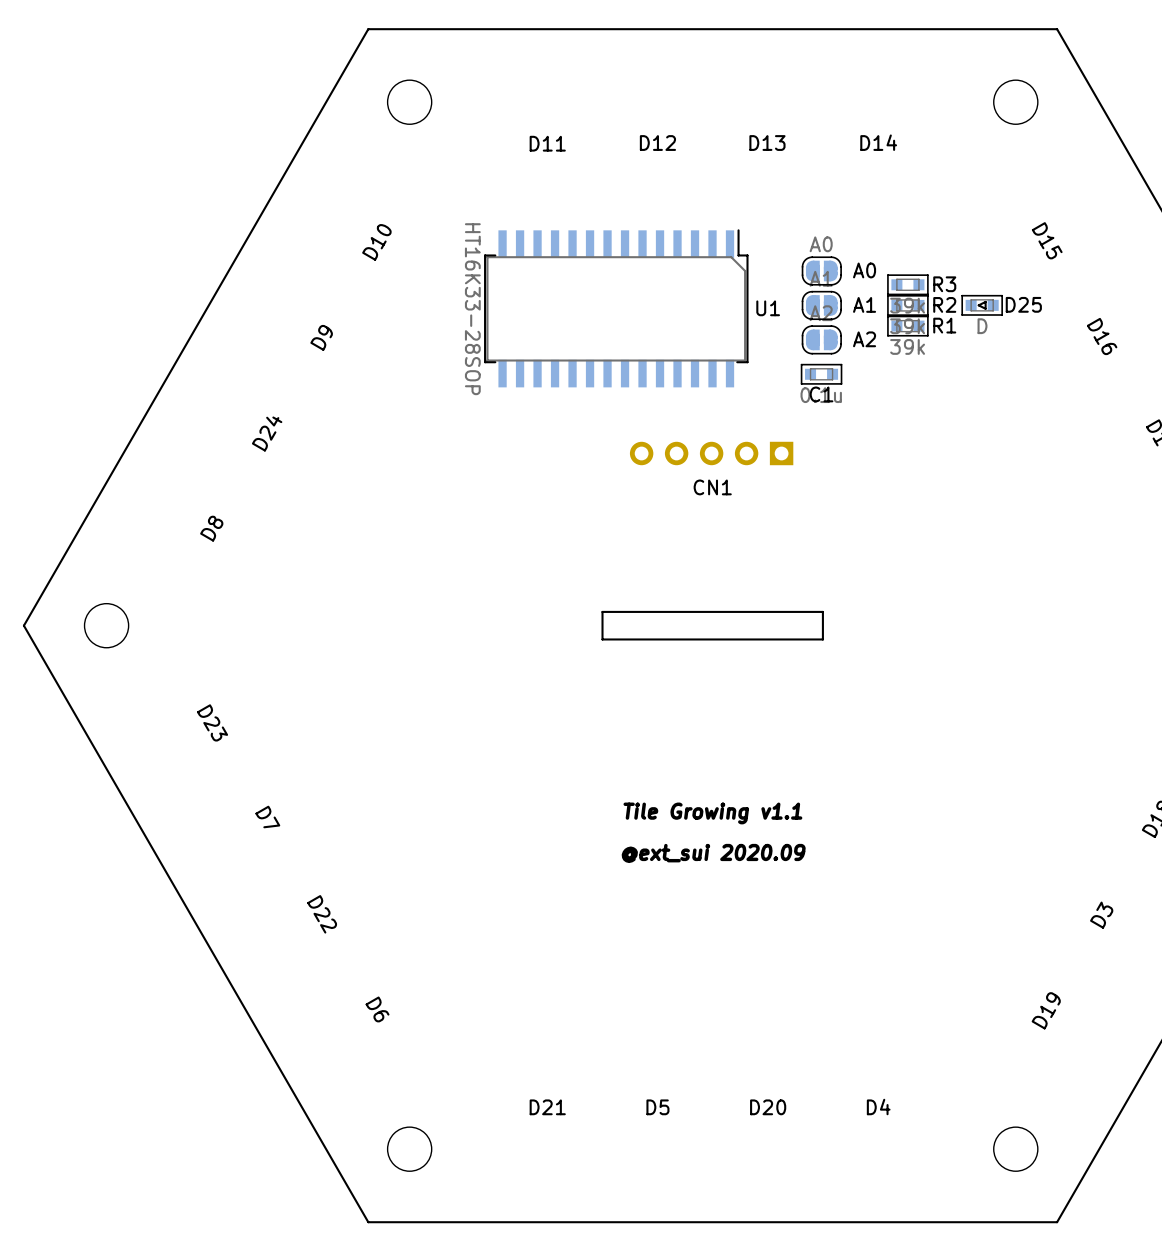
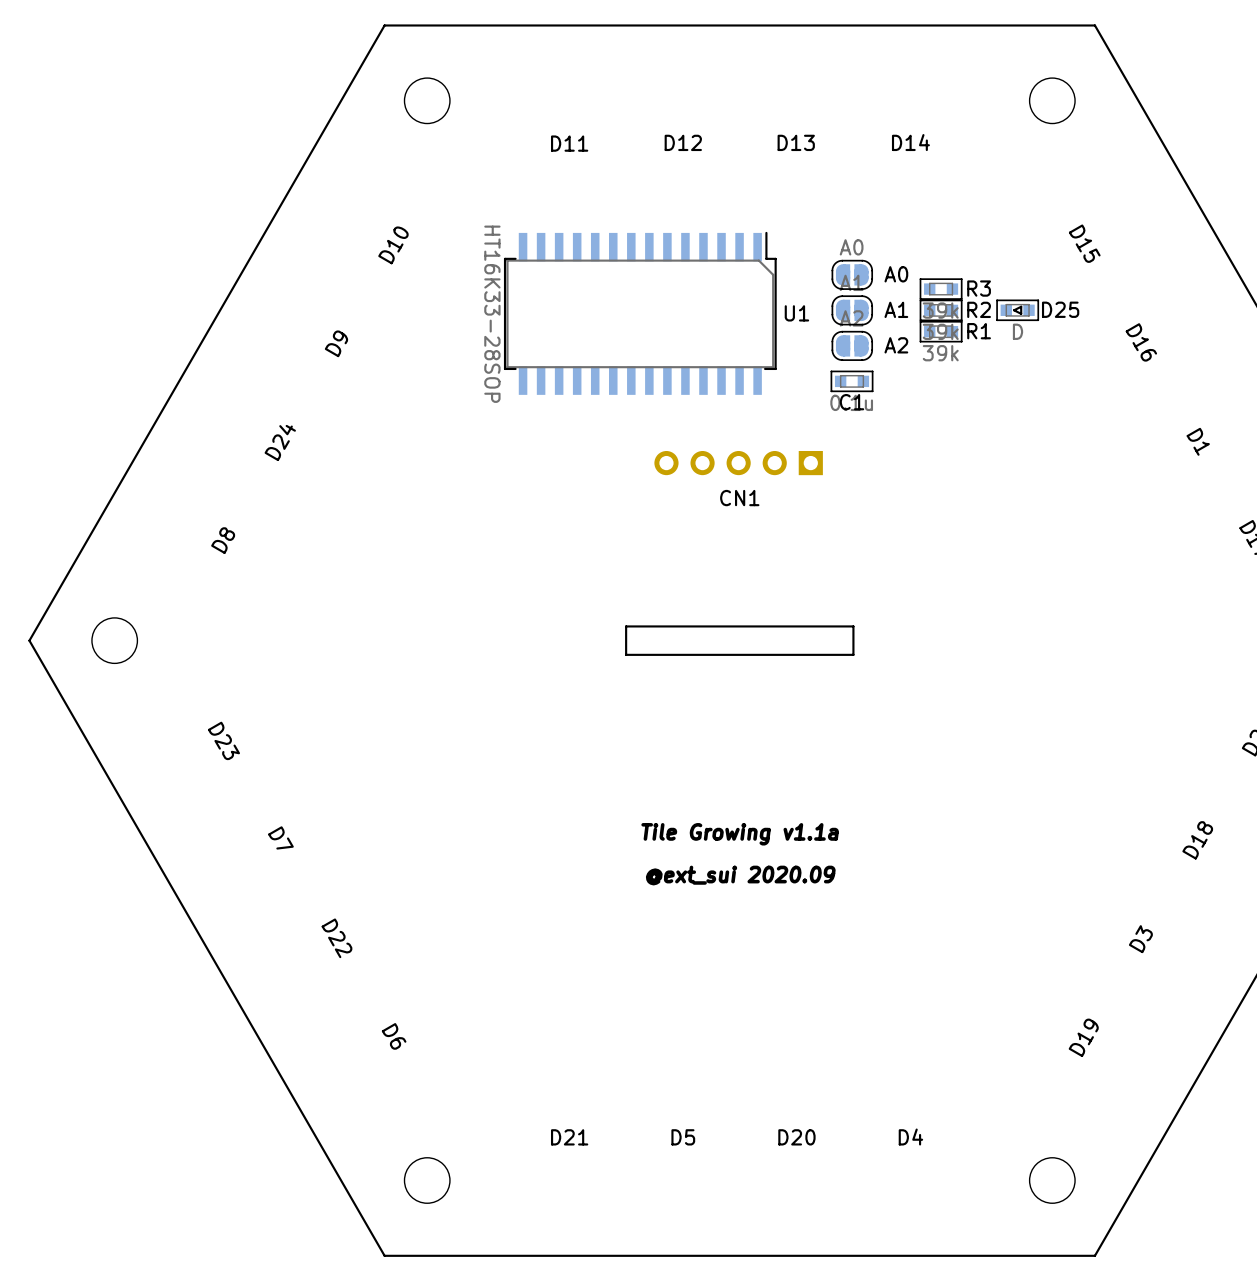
text: Tile Growing v1.1 (712, 813) -> Tile Growing v1.1a (740, 834)

